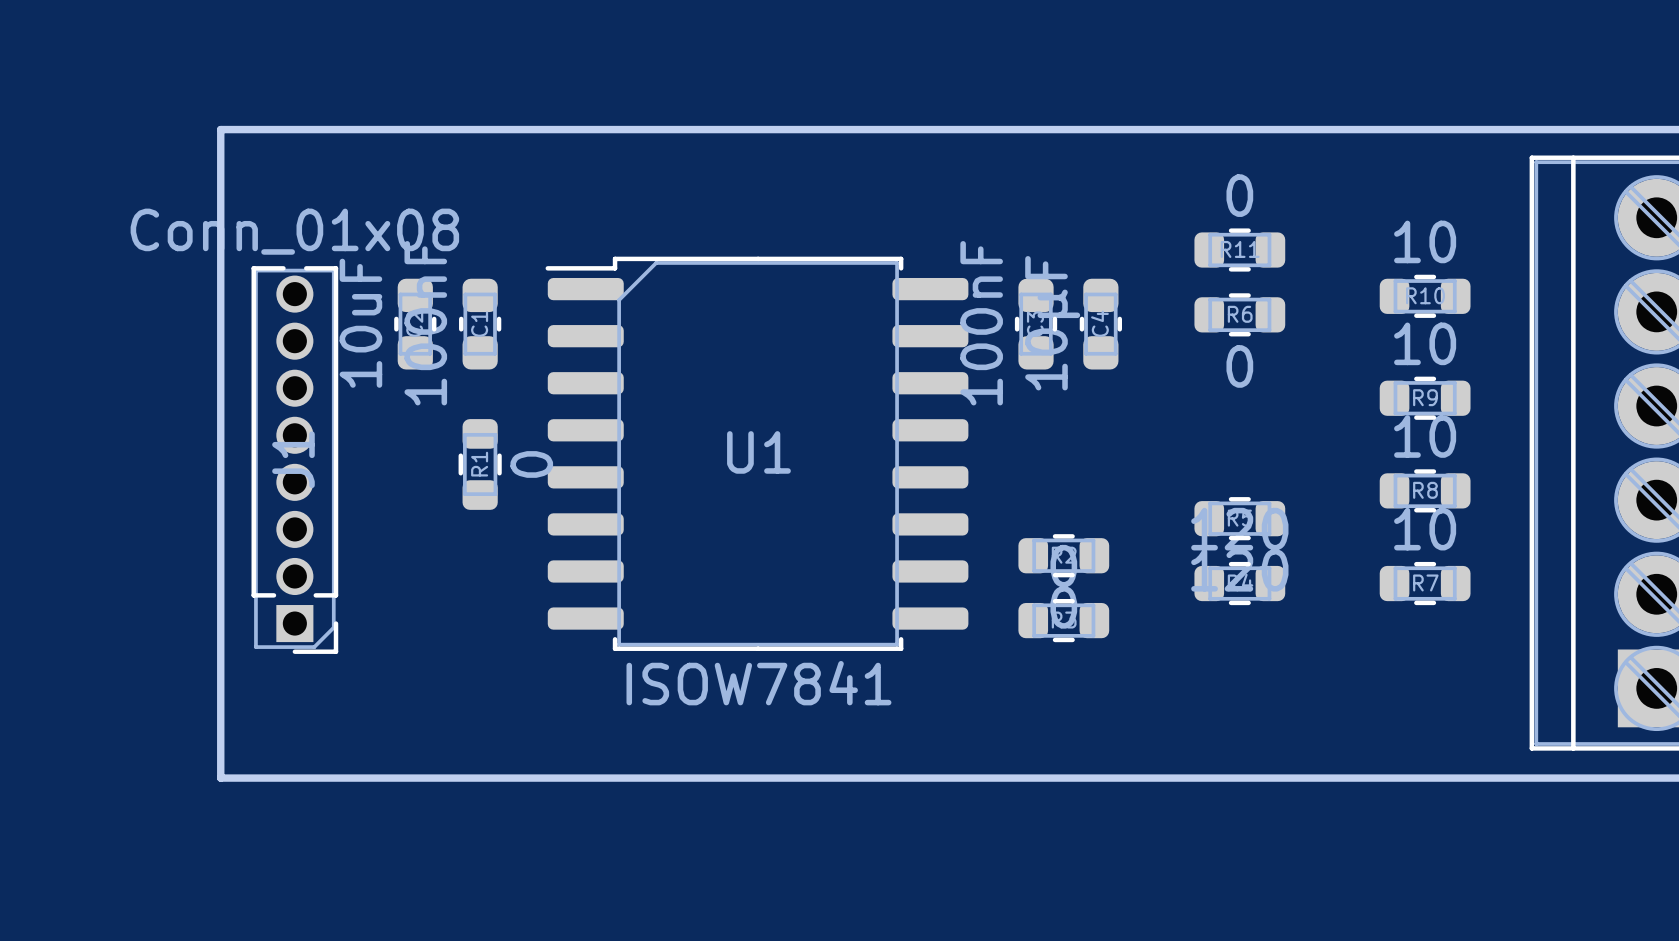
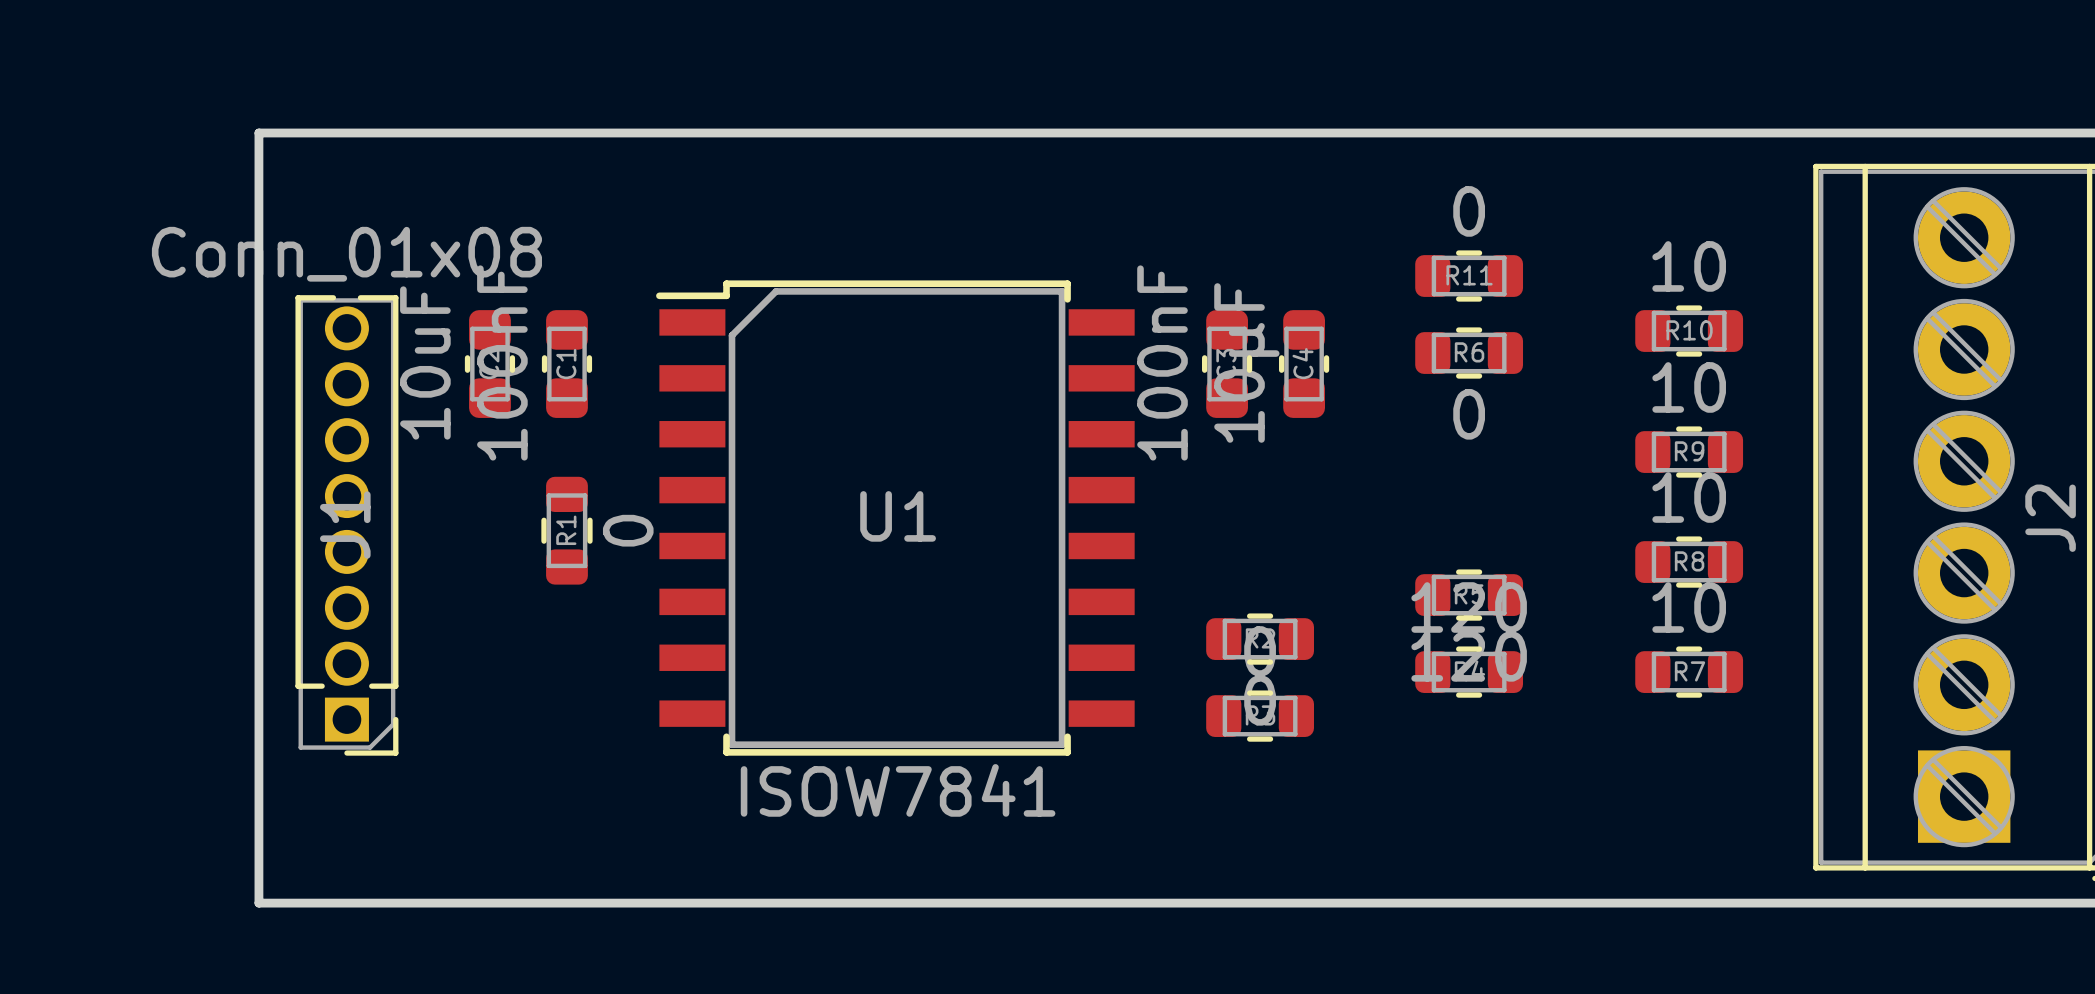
U1 footprint: [545, 256, 969, 651] -> [656, 280, 1135, 756]

